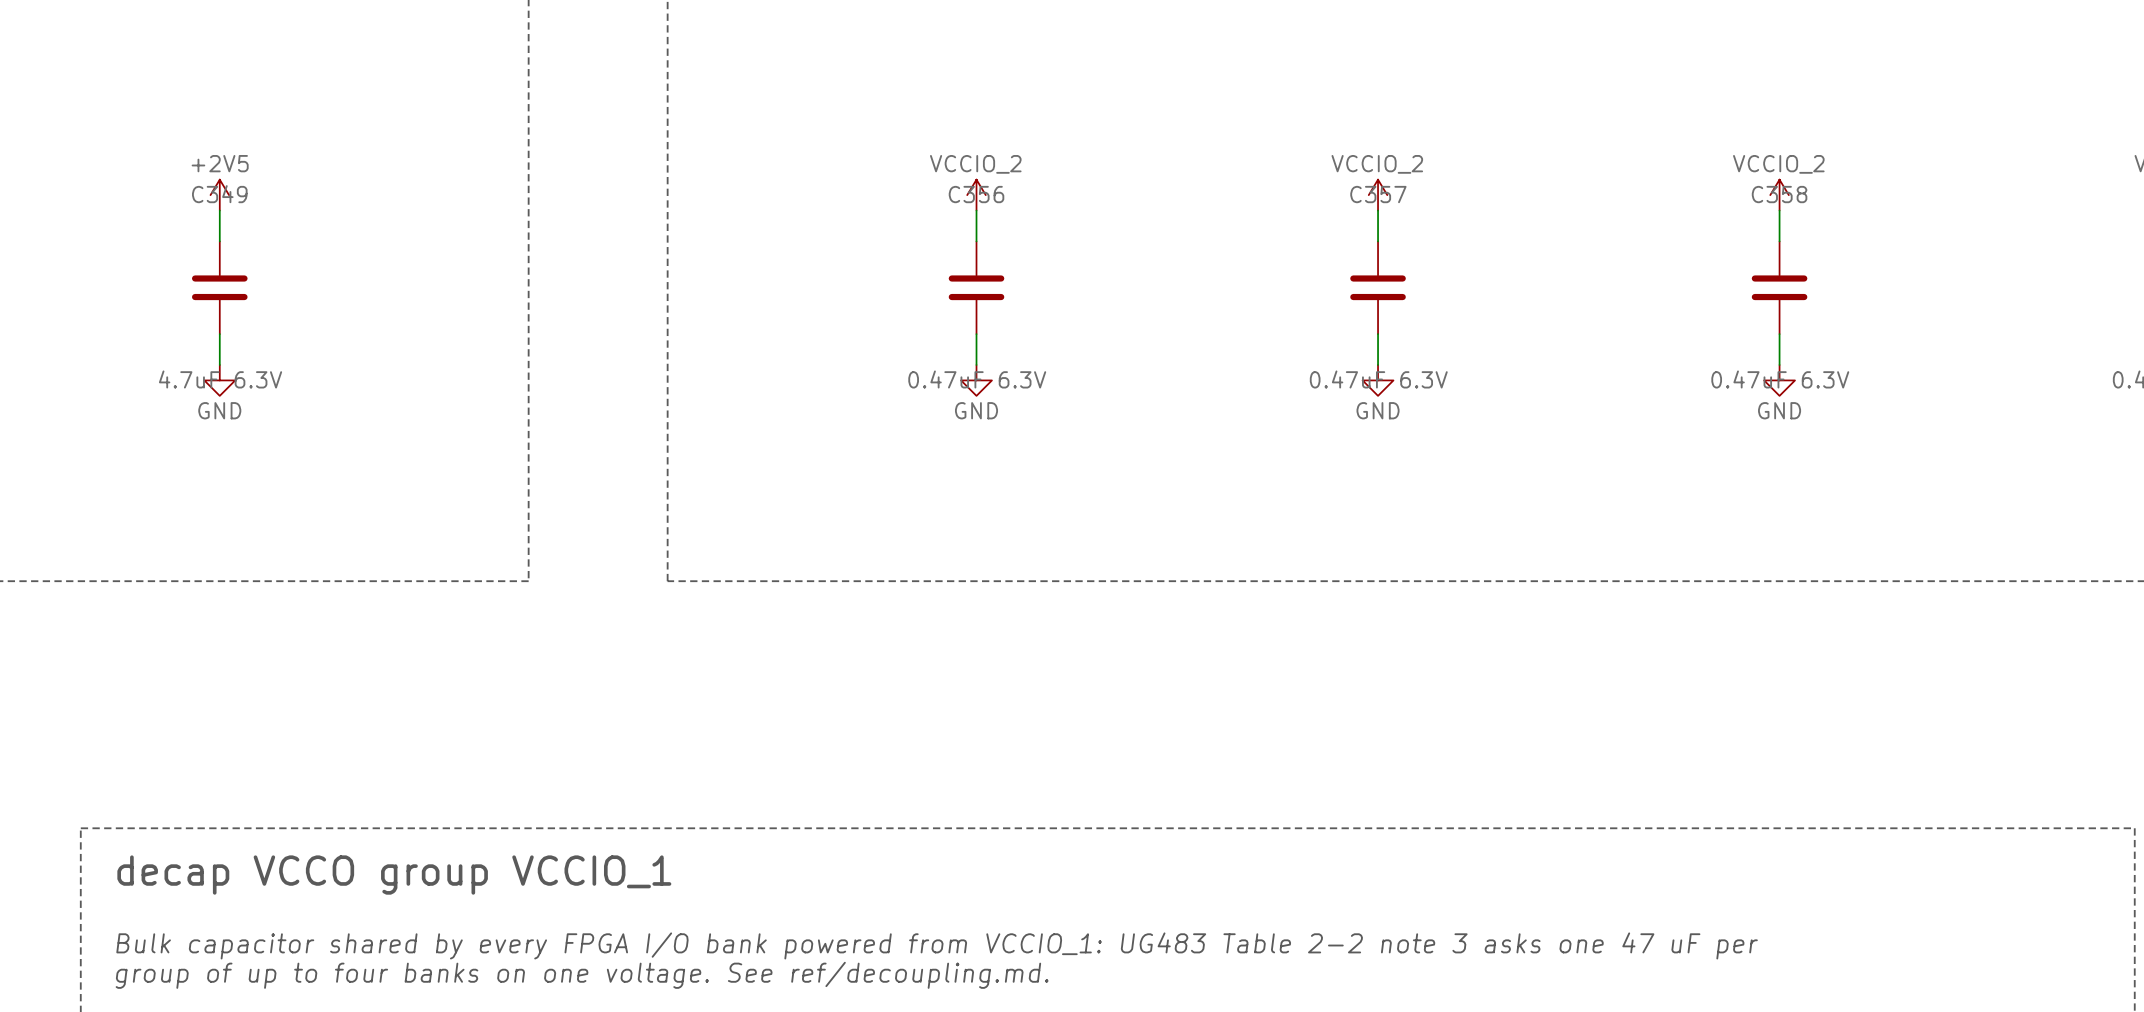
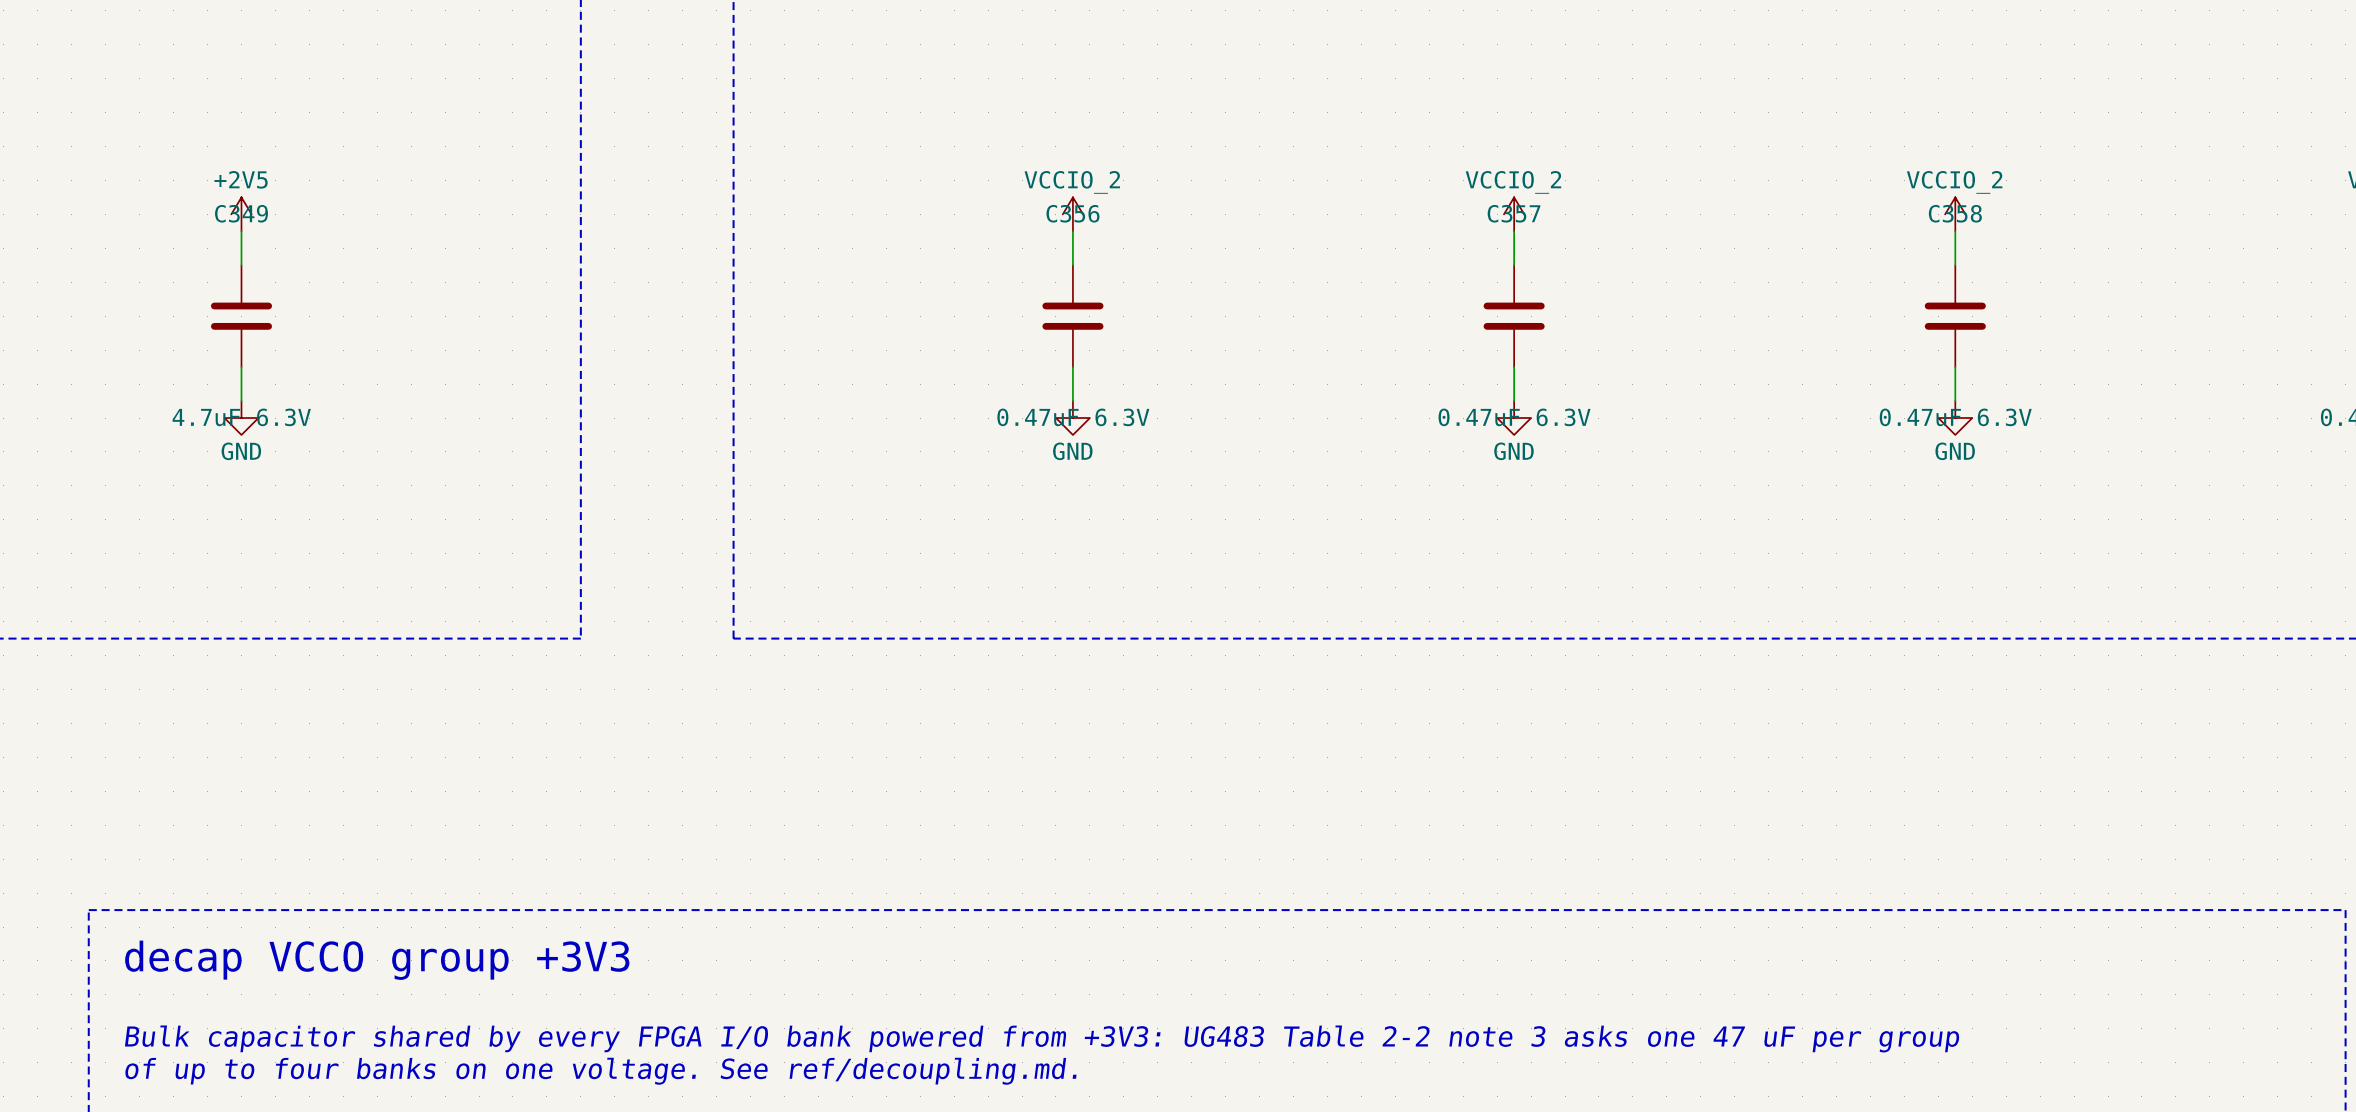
text: decap VCCO group VCCIO_1 (394, 875) -> decap VCCO group +3V3 (377, 960)
text: Bulk capacitor shared by every FPGA I/O bank powered from VCCIO_1: UG483 Table 2-2 note 3 asks one 47 uF per (937, 945) -> Bulk capacitor shared by every FPGA I/O bank powered from +3V3: UG483 Table 2-2 note 3 asks one 47 uF per group (1042, 1038)
text: group of up to four banks on one voltage. See ref/decoupling.md. (582, 975) -> of up to four banks on one voltage. See ref/decoupling.md. (600, 1071)

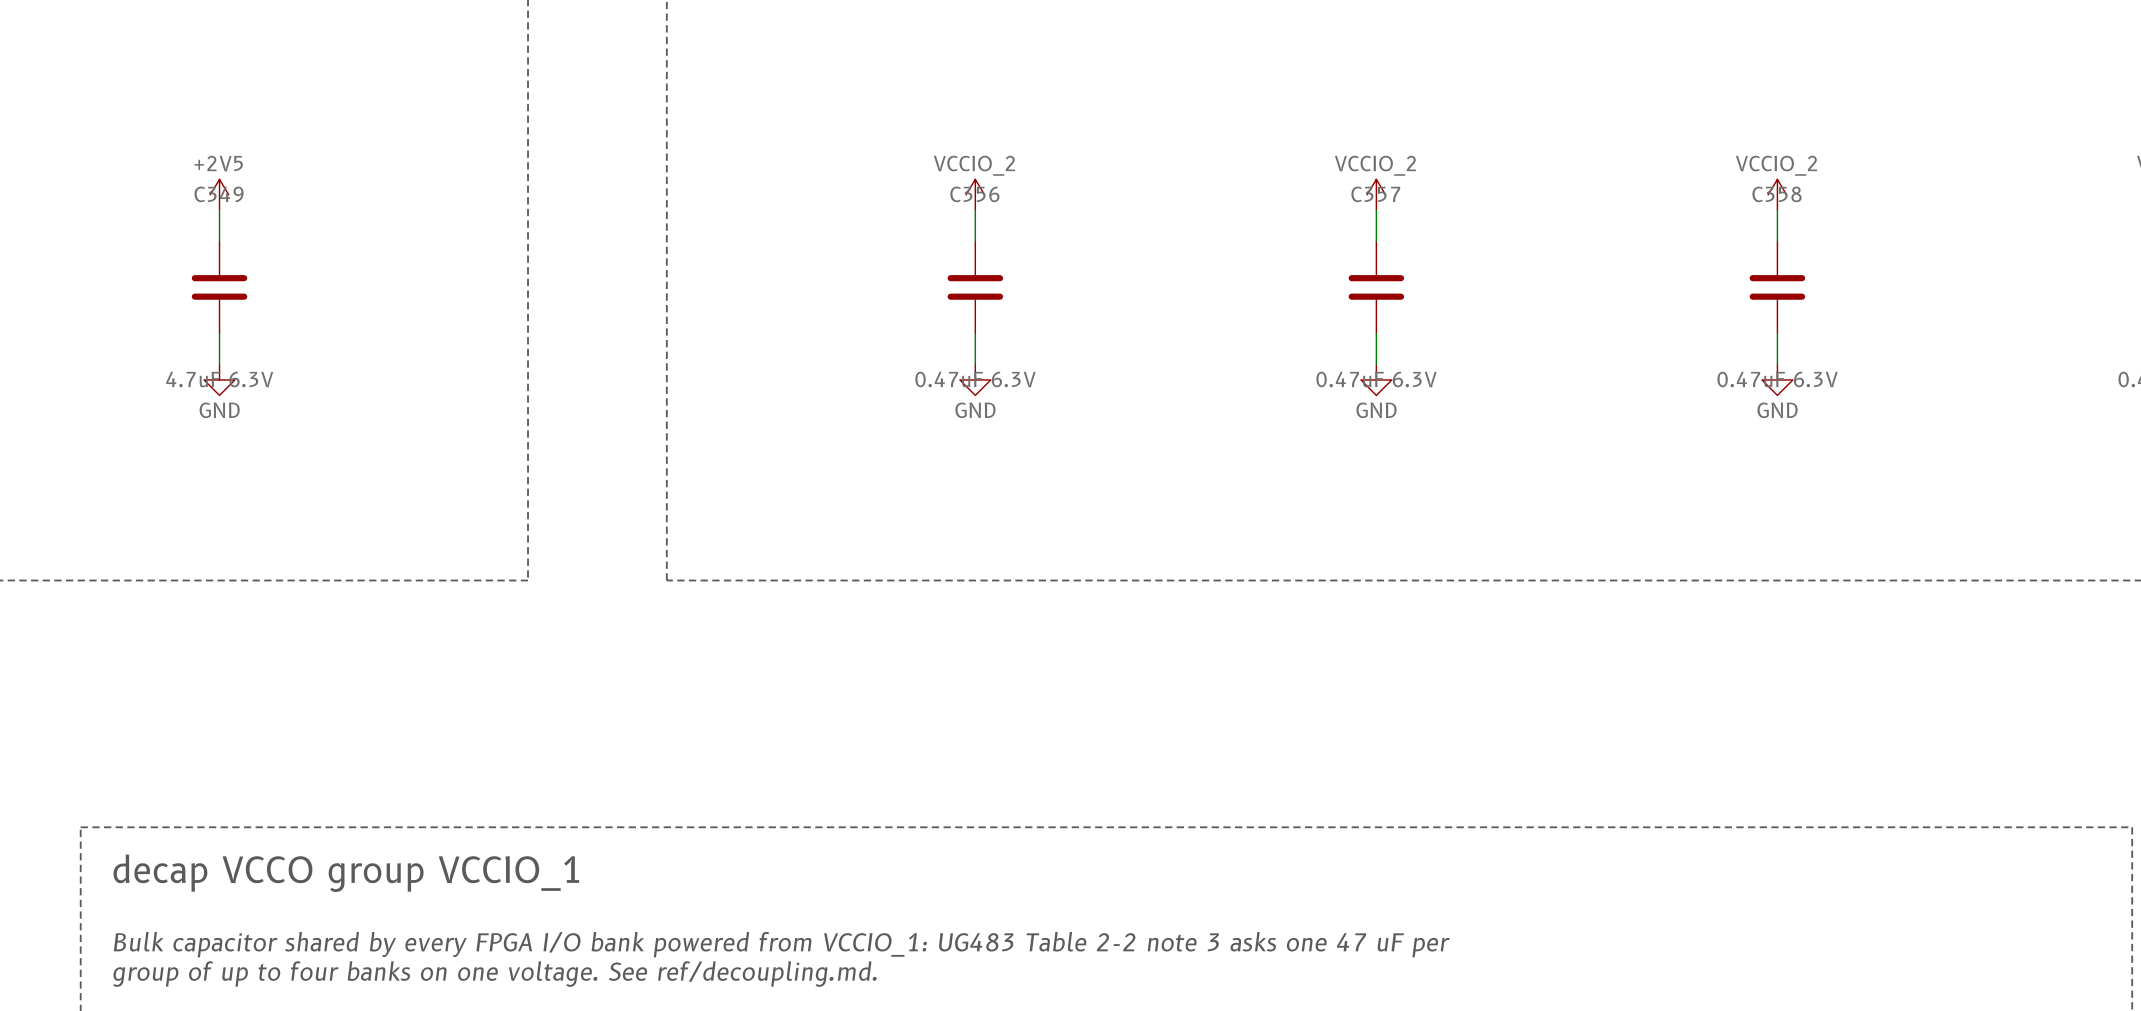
text: decap VCCO group +3V3 (377, 960) -> decap VCCO group VCCIO_1 (346, 873)
text: Bulk capacitor shared by every FPGA I/O bank powered from +3V3: UG483 Table 2-2 note 3 asks one 47 uF per group (1042, 1038) -> Bulk capacitor shared by every FPGA I/O bank powered from VCCIO_1: UG483 Table 2-2 note 3 asks one 47 uF per (781, 944)
text: of up to four banks on one voltage. See ref/decoupling.md. (600, 1071) -> group of up to four banks on one voltage. See ref/decoupling.md. (494, 974)

